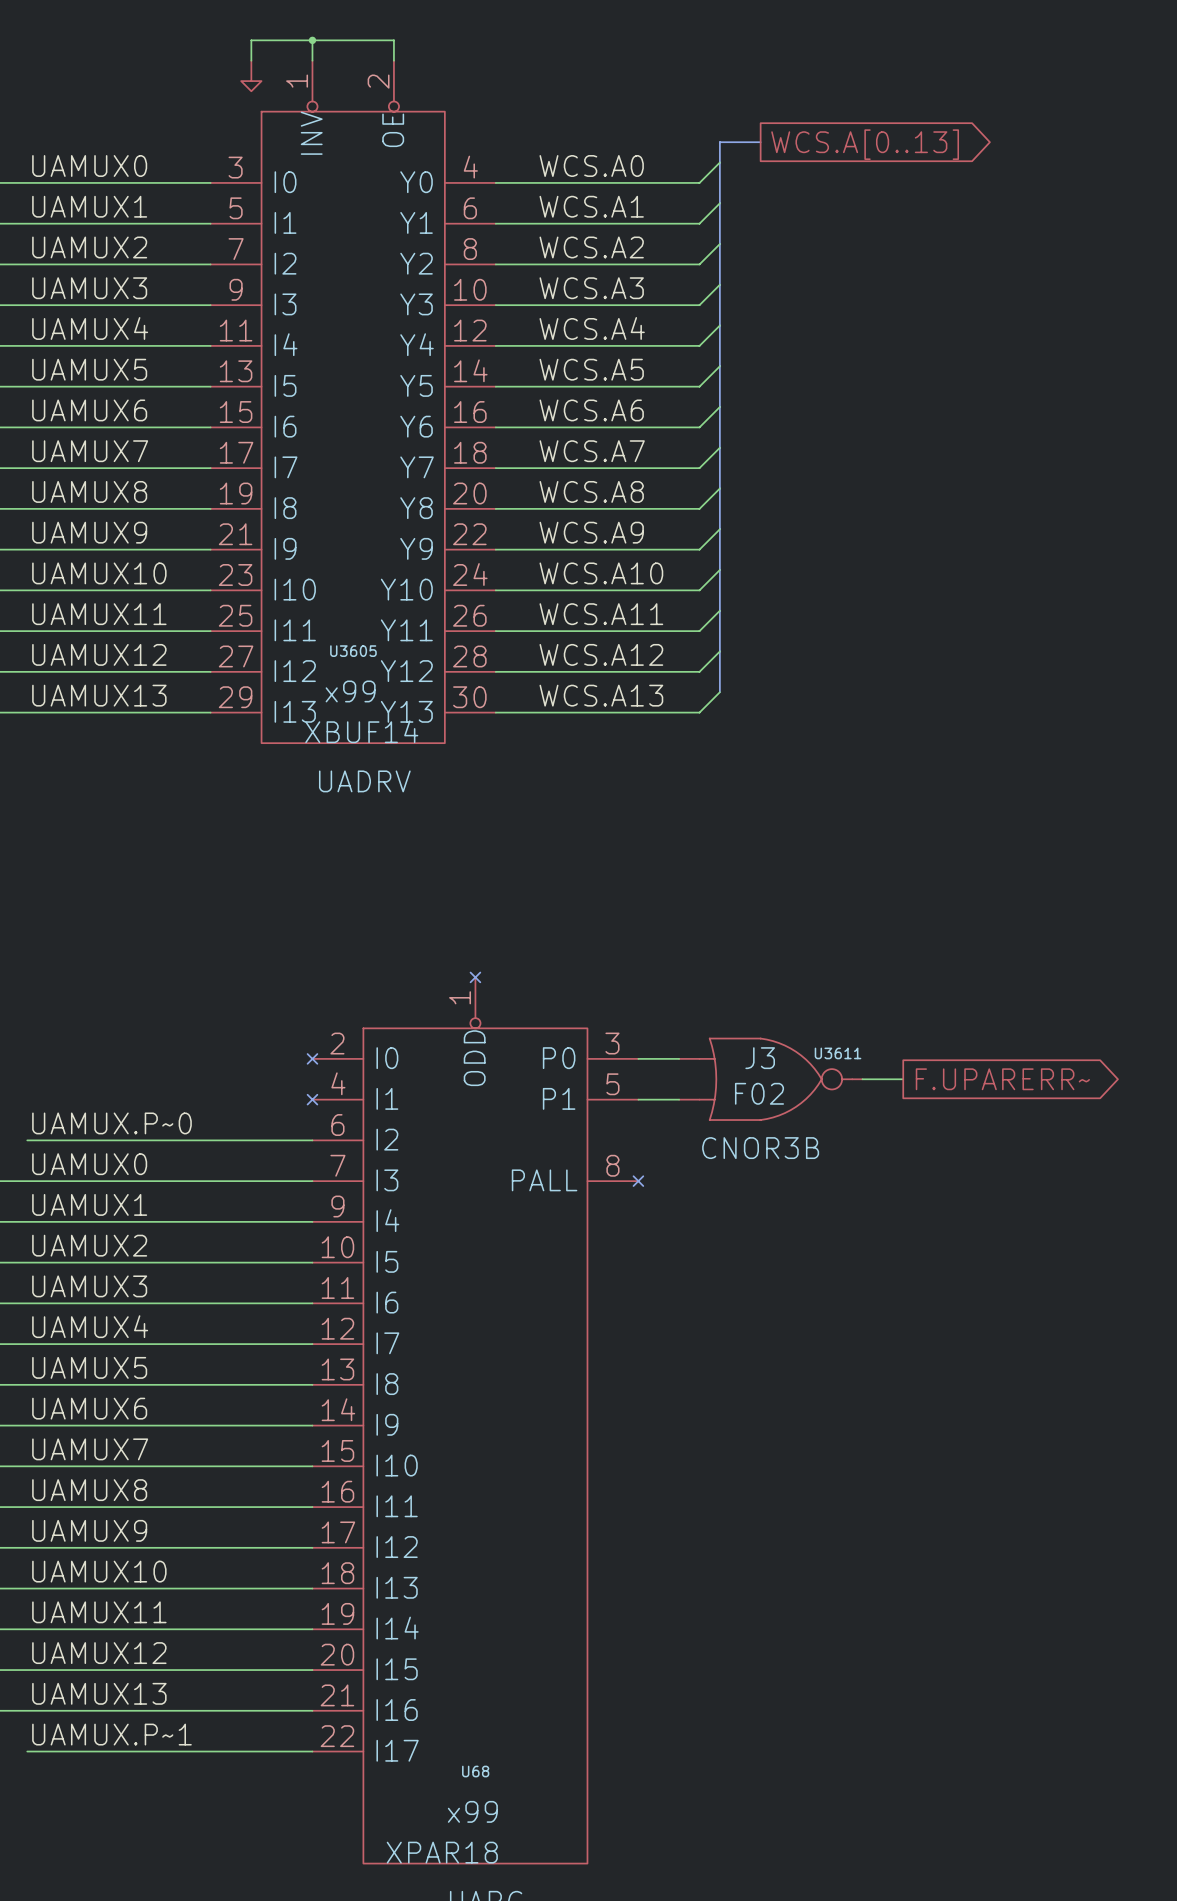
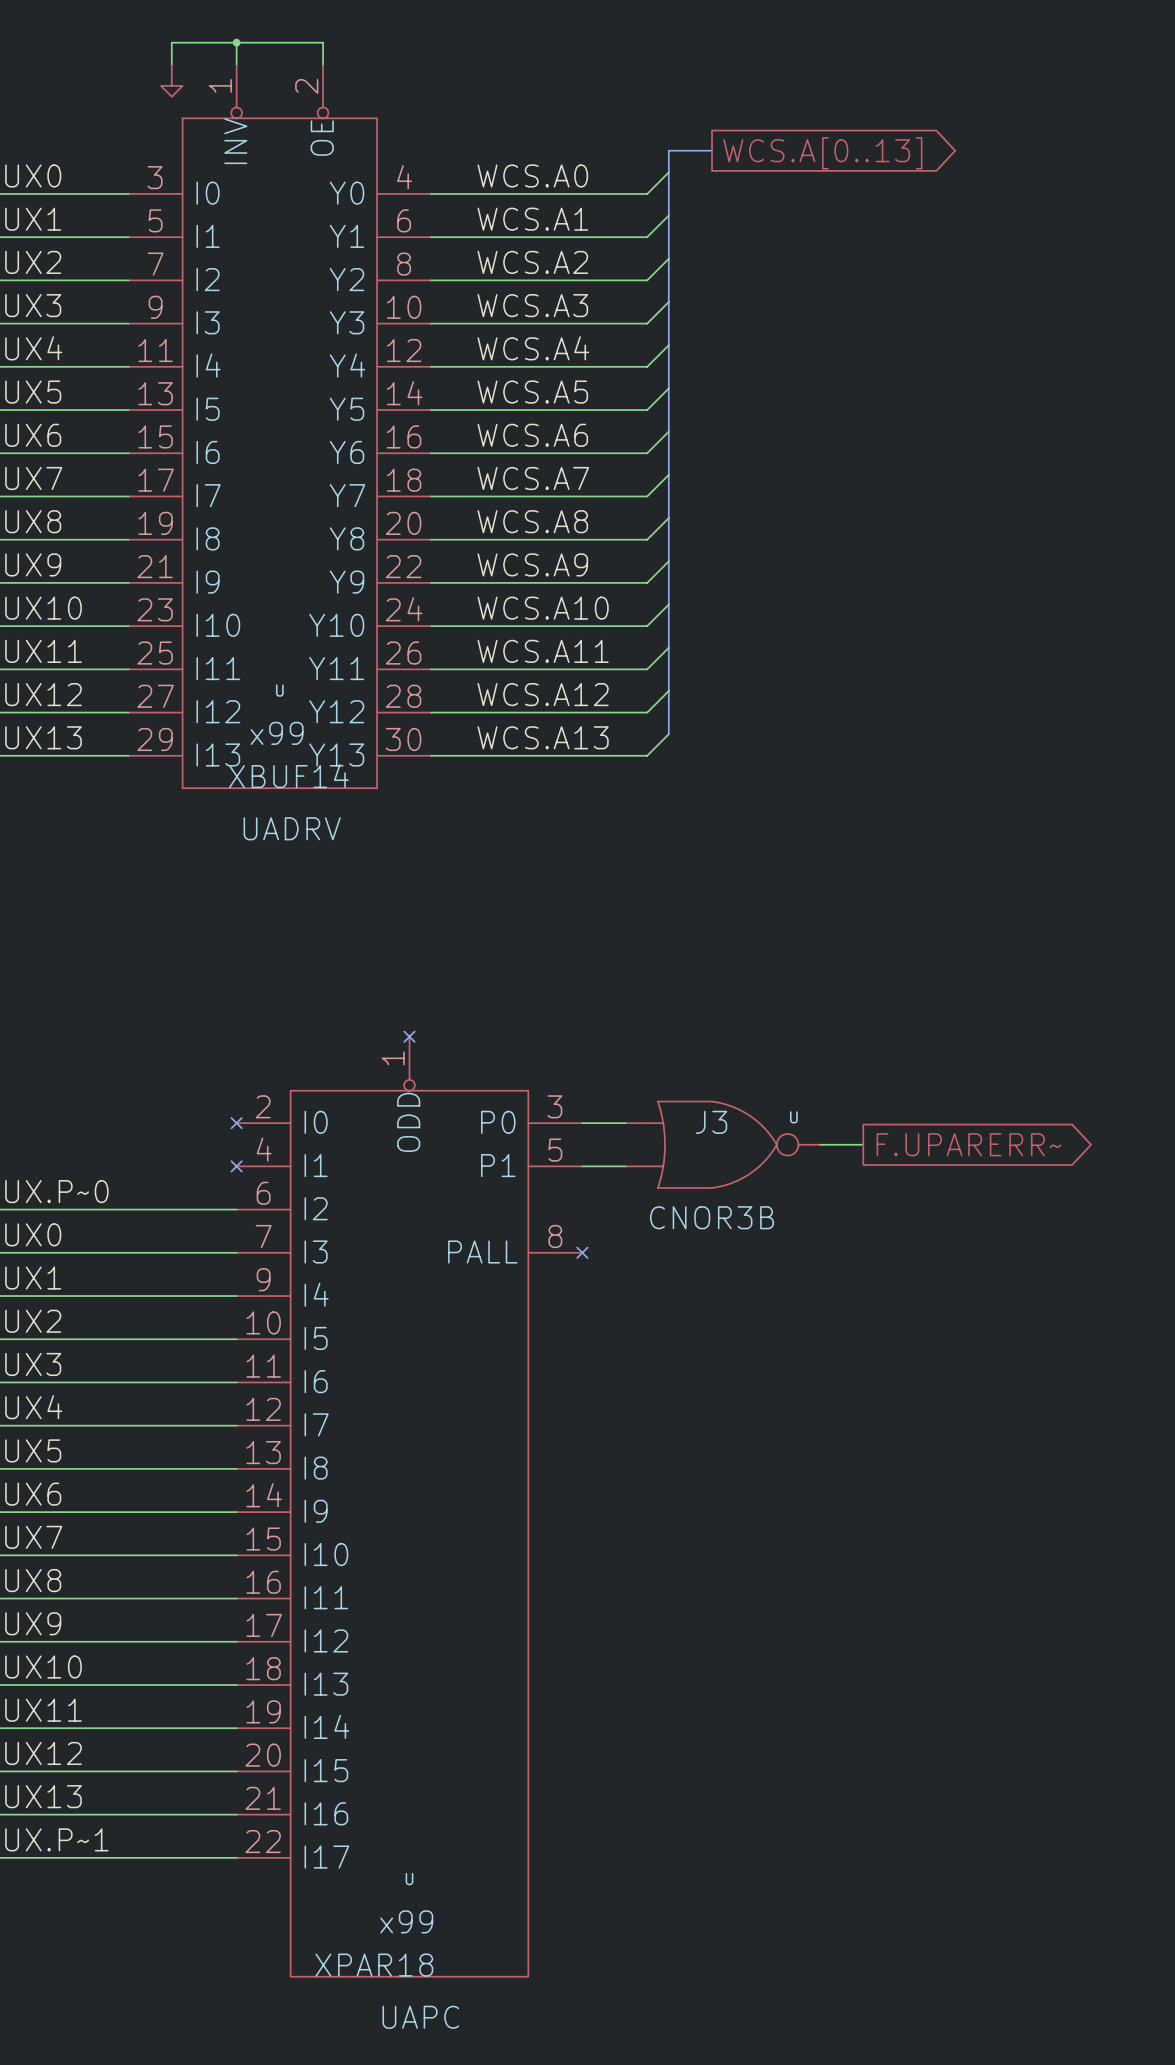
U3605 name: U3605 (353, 651) -> U (279, 690)
U3611 name: U3611 (838, 1053) -> U (793, 1117)
U3611 value: F02 (759, 1093) -> none
U68 name: U68 (475, 1771) -> U (409, 1879)

